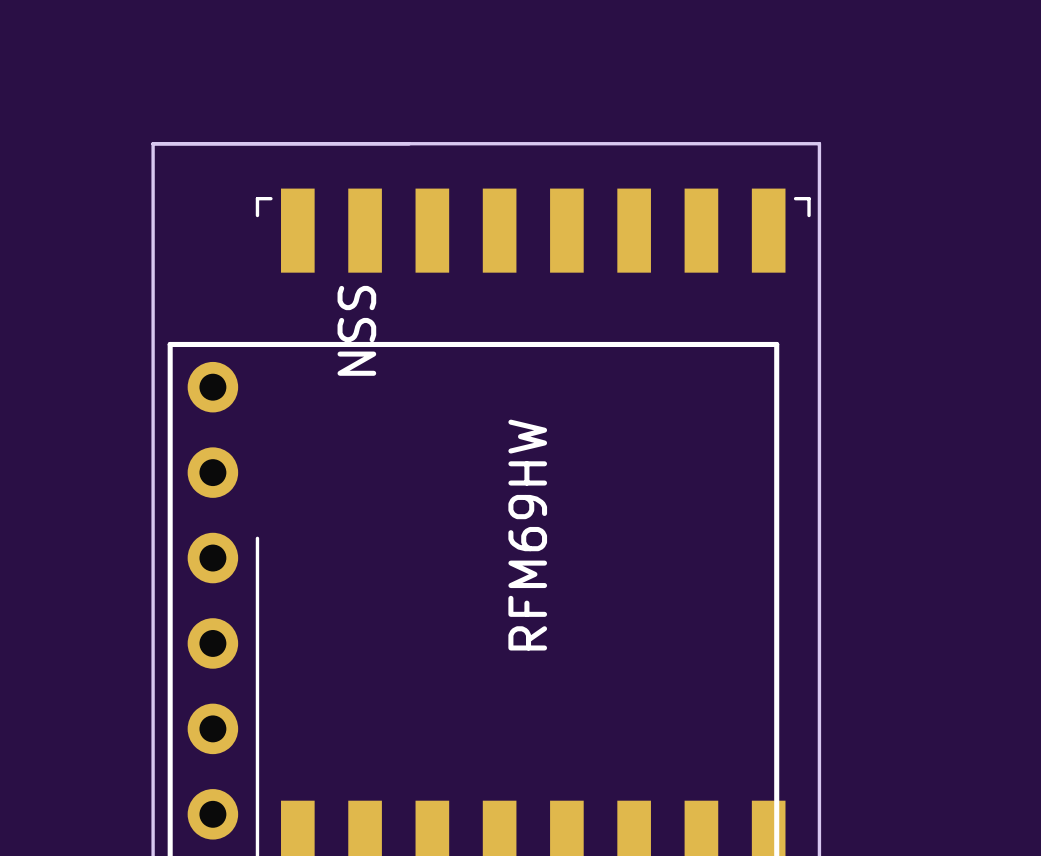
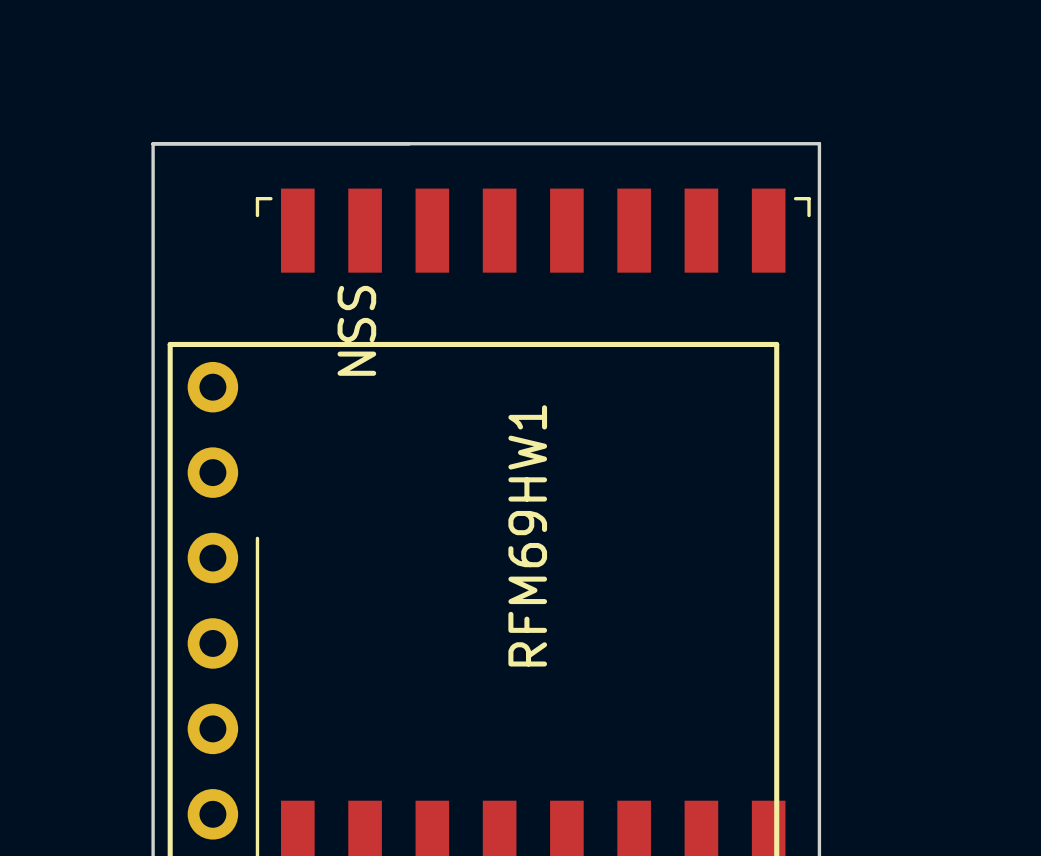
RFM69HW name: RFM69HW (527, 535) -> RFM69HW1 (527, 535)

